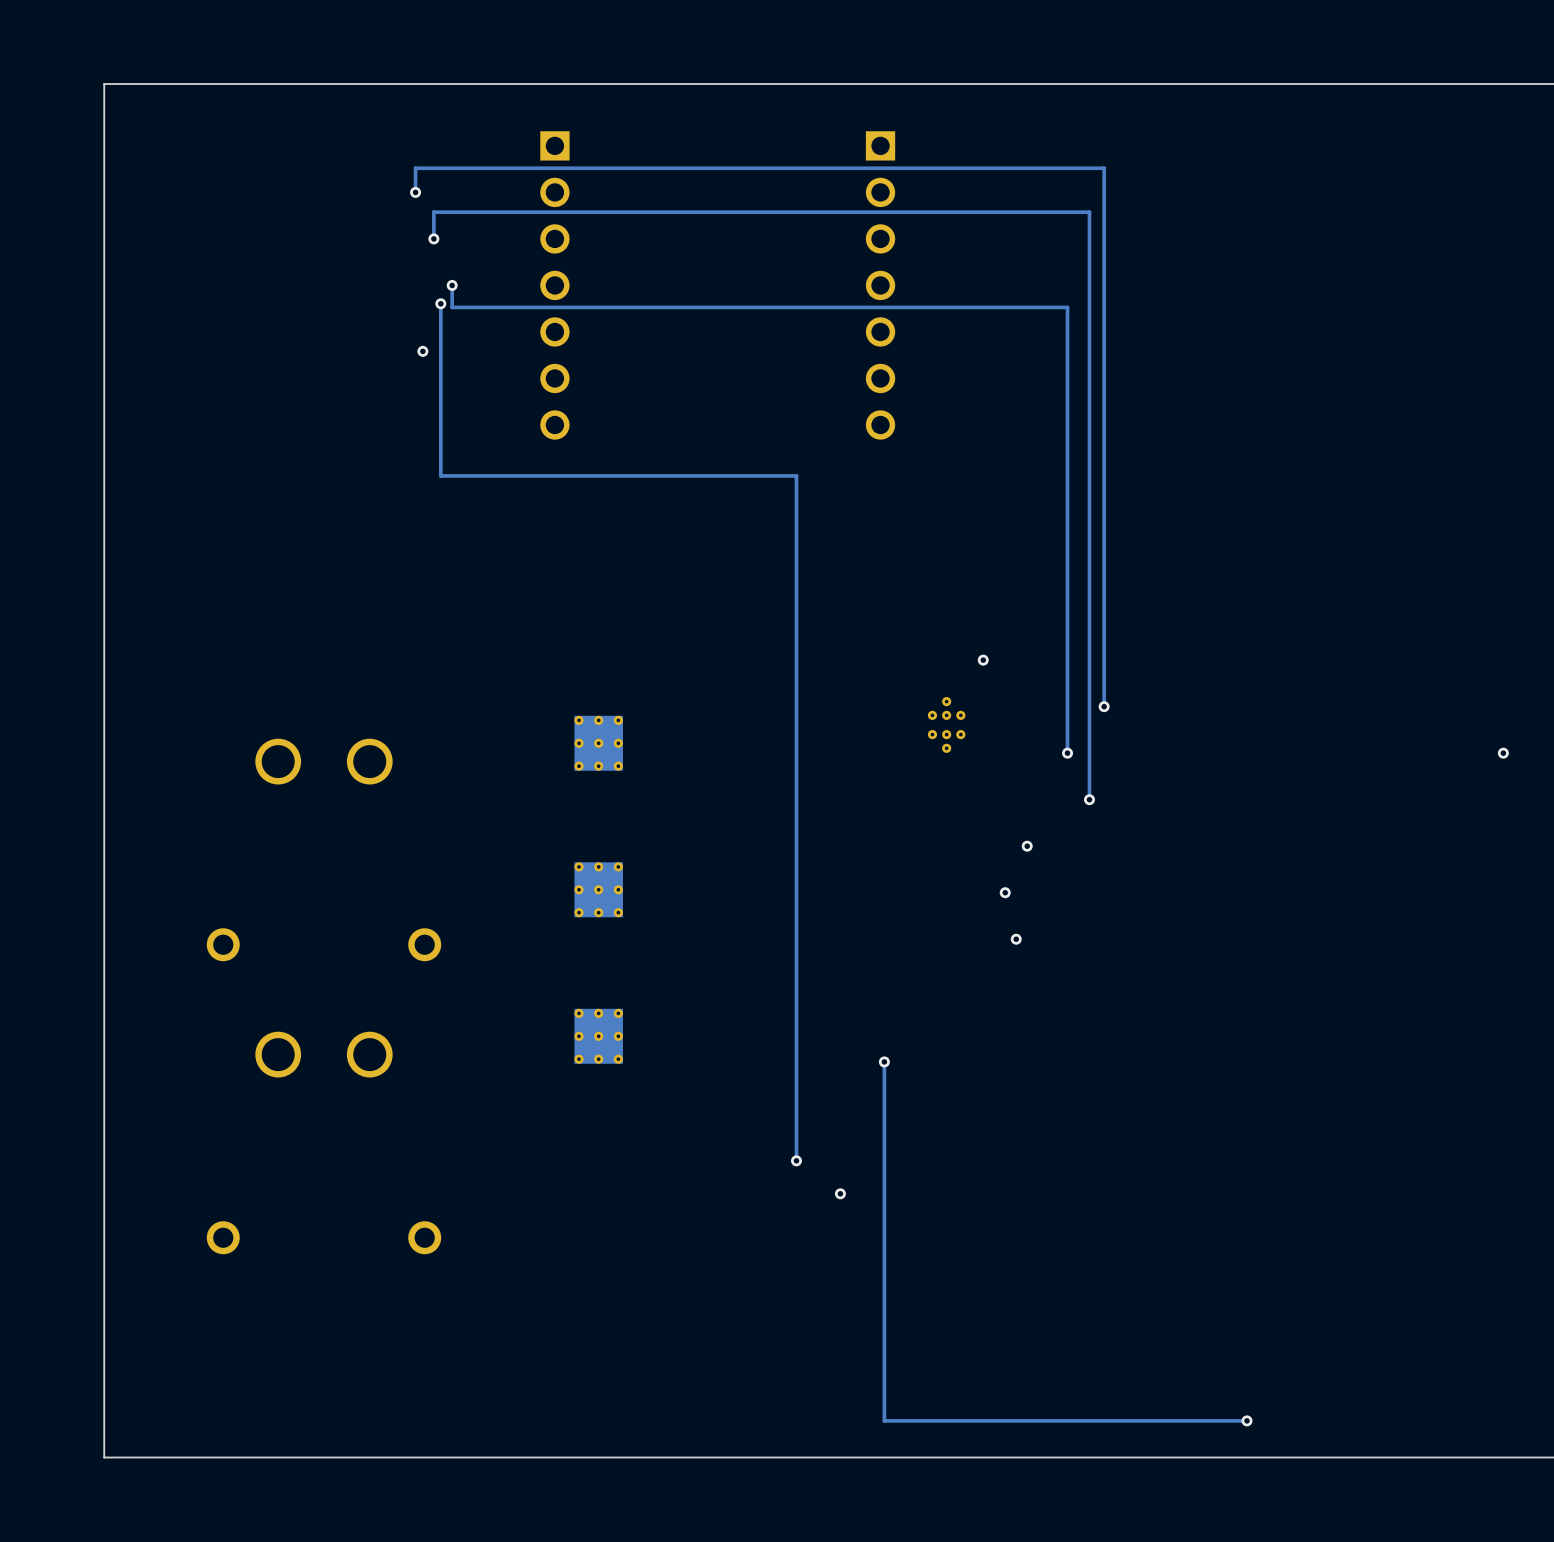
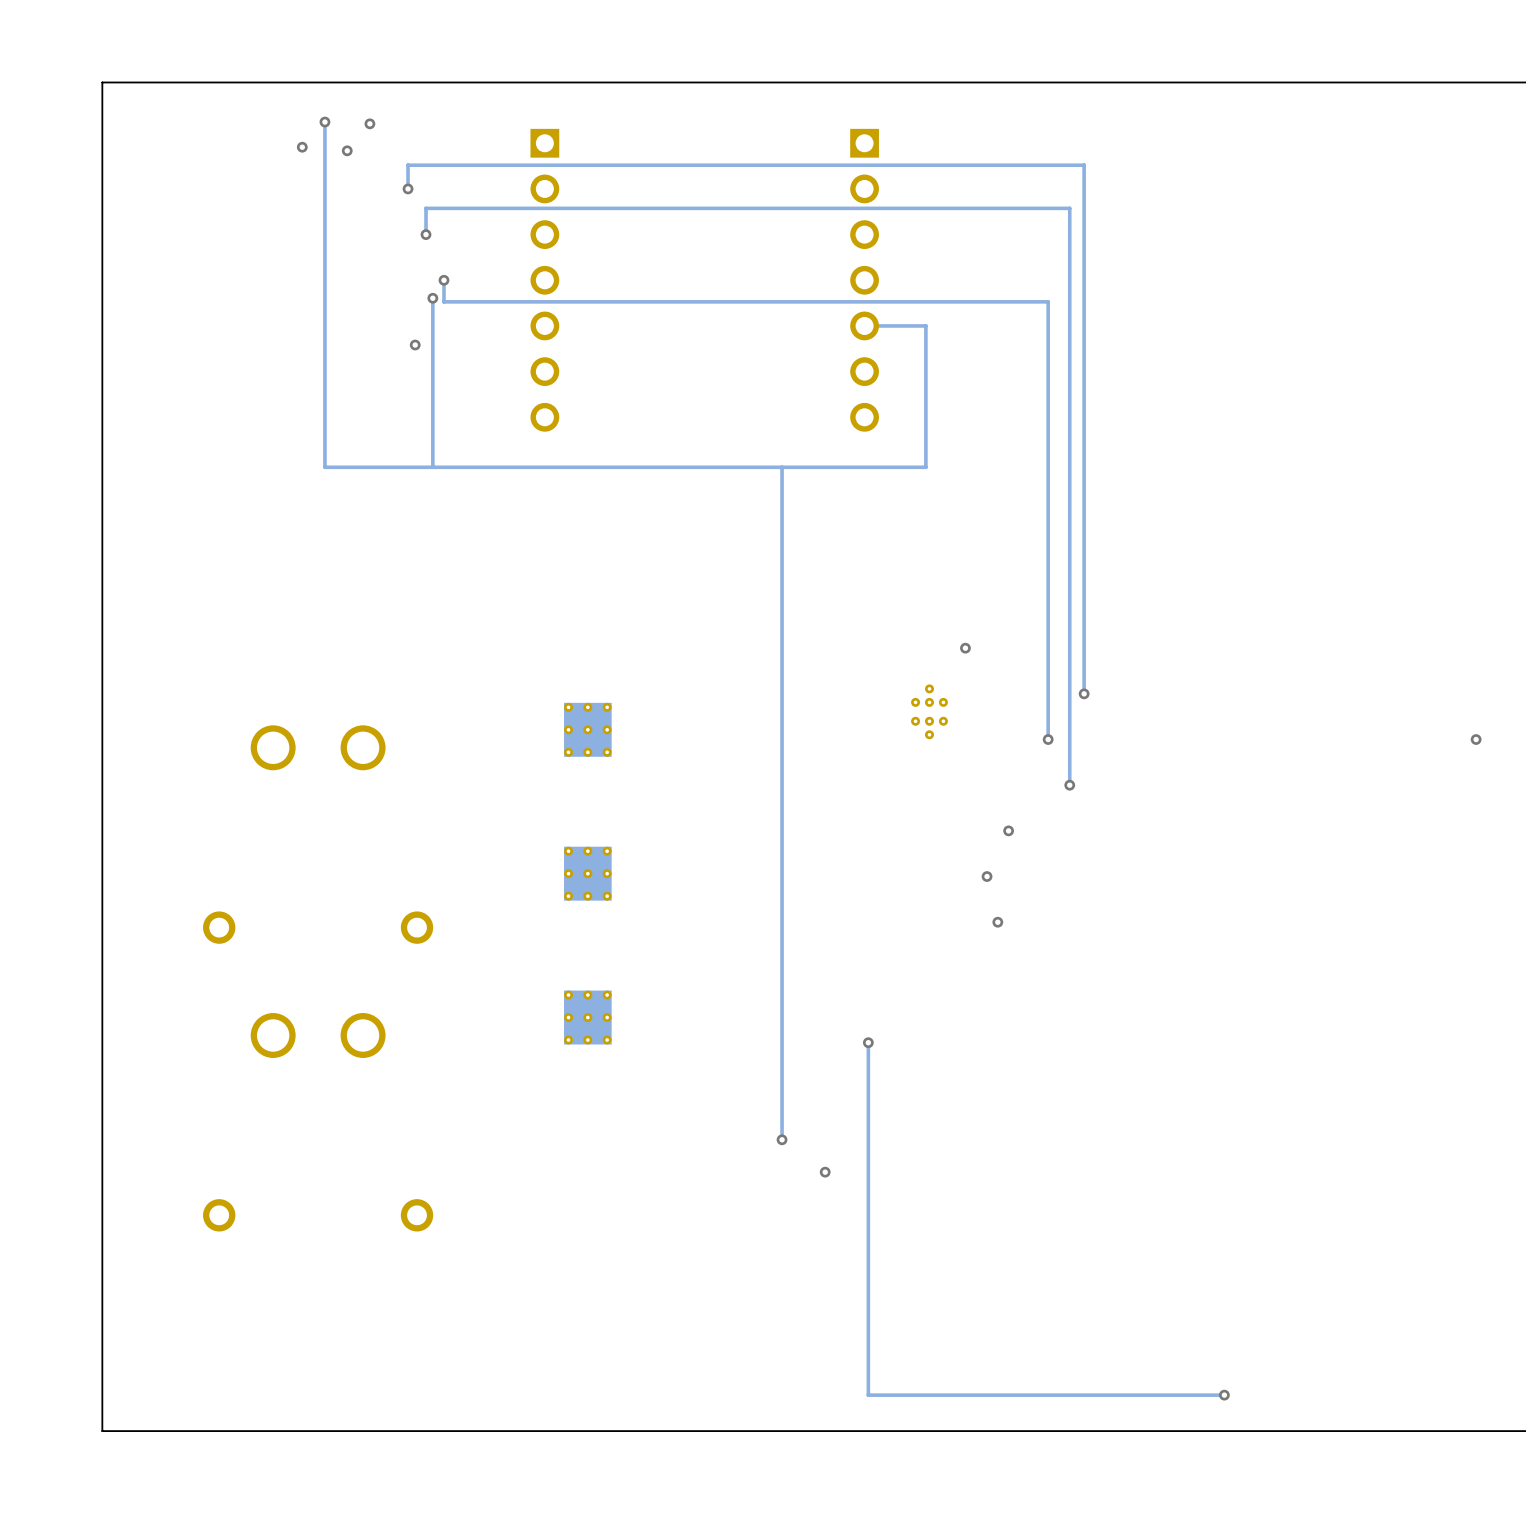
track: none -> (324, 122) (324, 467) (432, 467)
via: none -> (324, 122)
via: none -> (369, 123)
via: none -> (302, 147)
via: none -> (347, 150)
track: none -> (864, 325) (925, 325) (925, 467) (782, 467)

